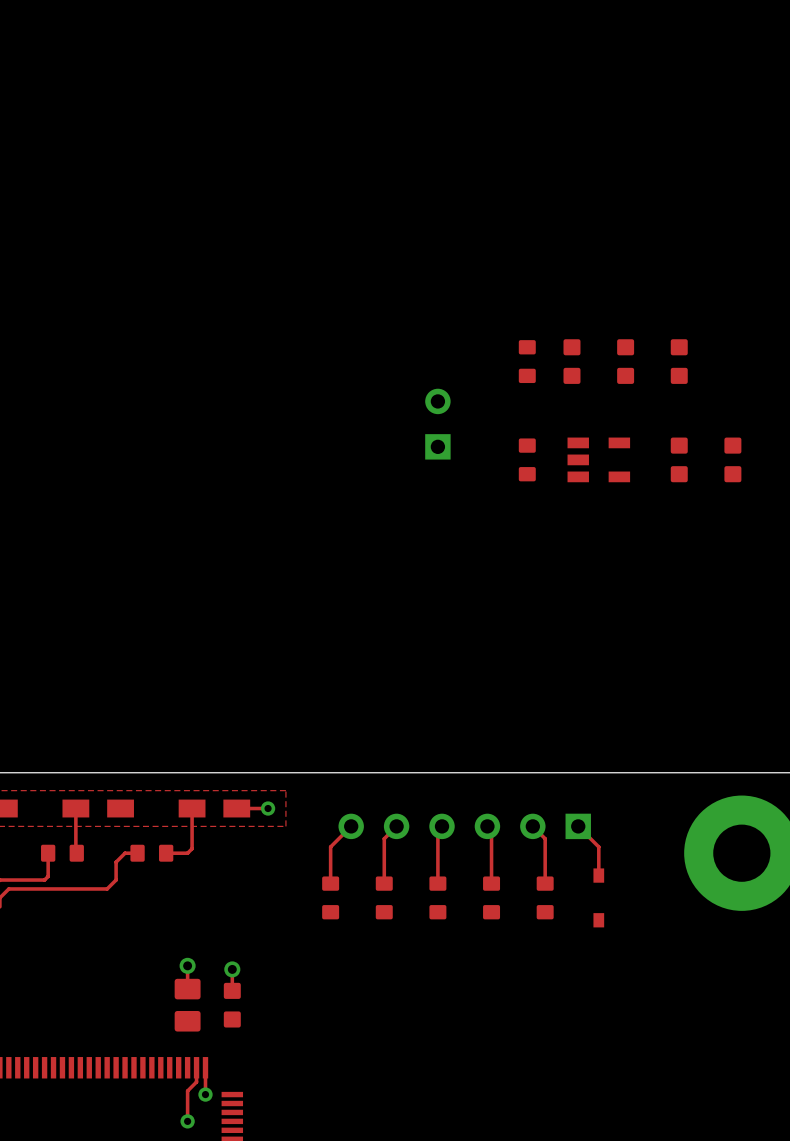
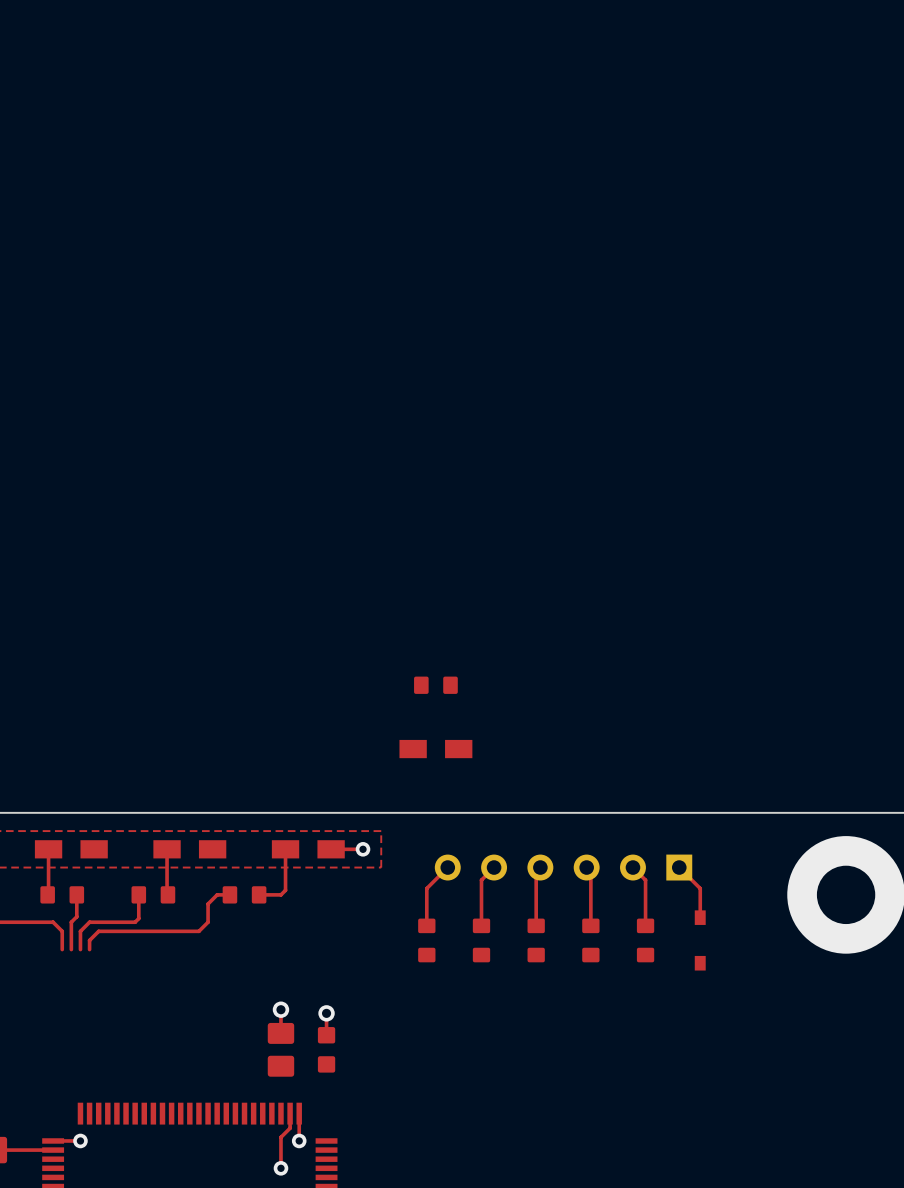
part: (527, 361) -> none
part: (571, 361) -> none
part: (625, 361) -> none
part: (679, 361) -> none
part: (437, 424) -> none
part: (527, 459) -> none
part: (598, 459) -> none
part: (679, 459) -> none
part: (732, 459) -> none
part: none -> (435, 685)
part: none -> (435, 749)

